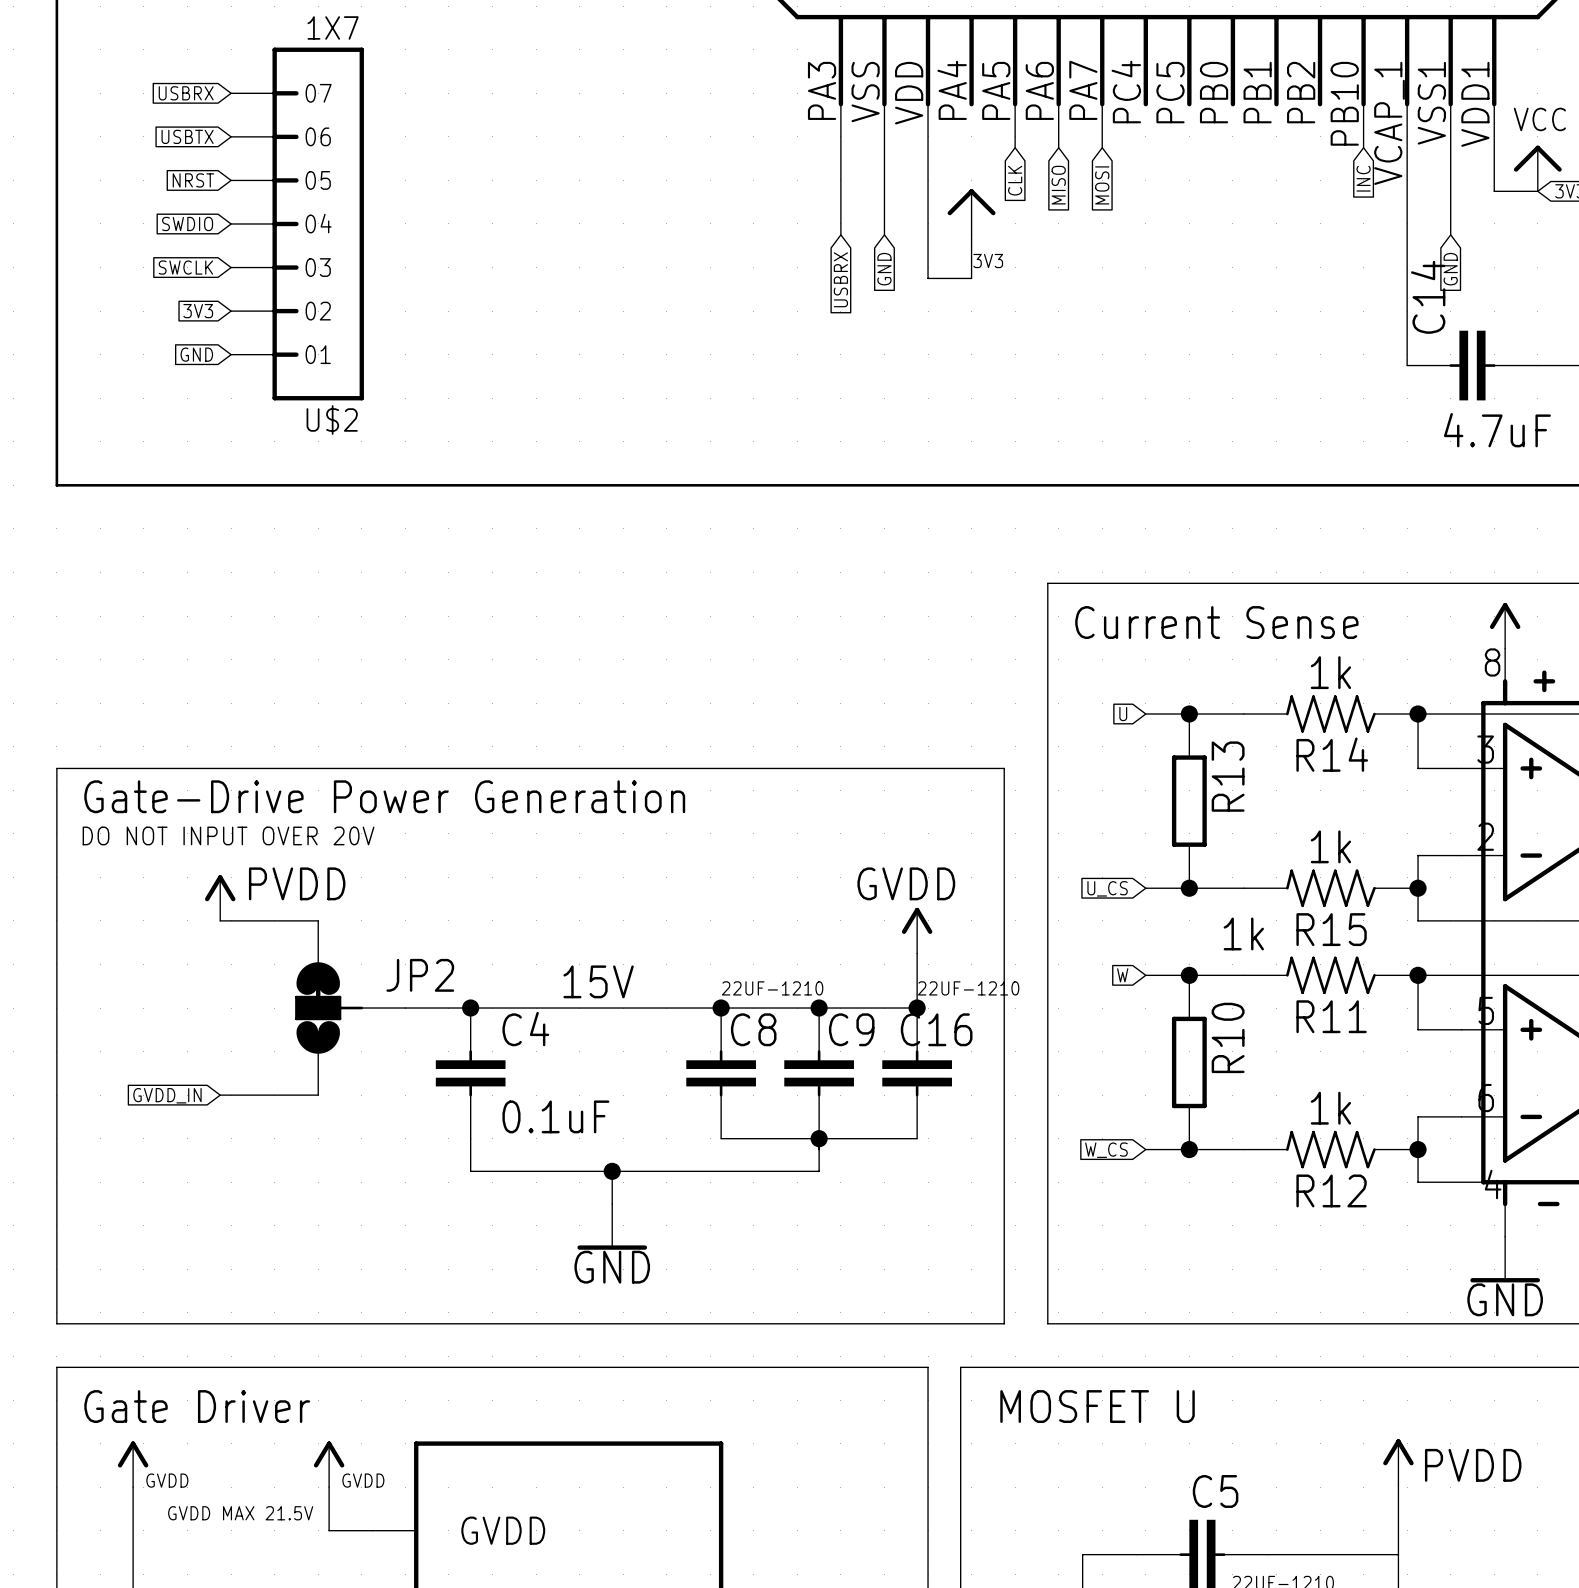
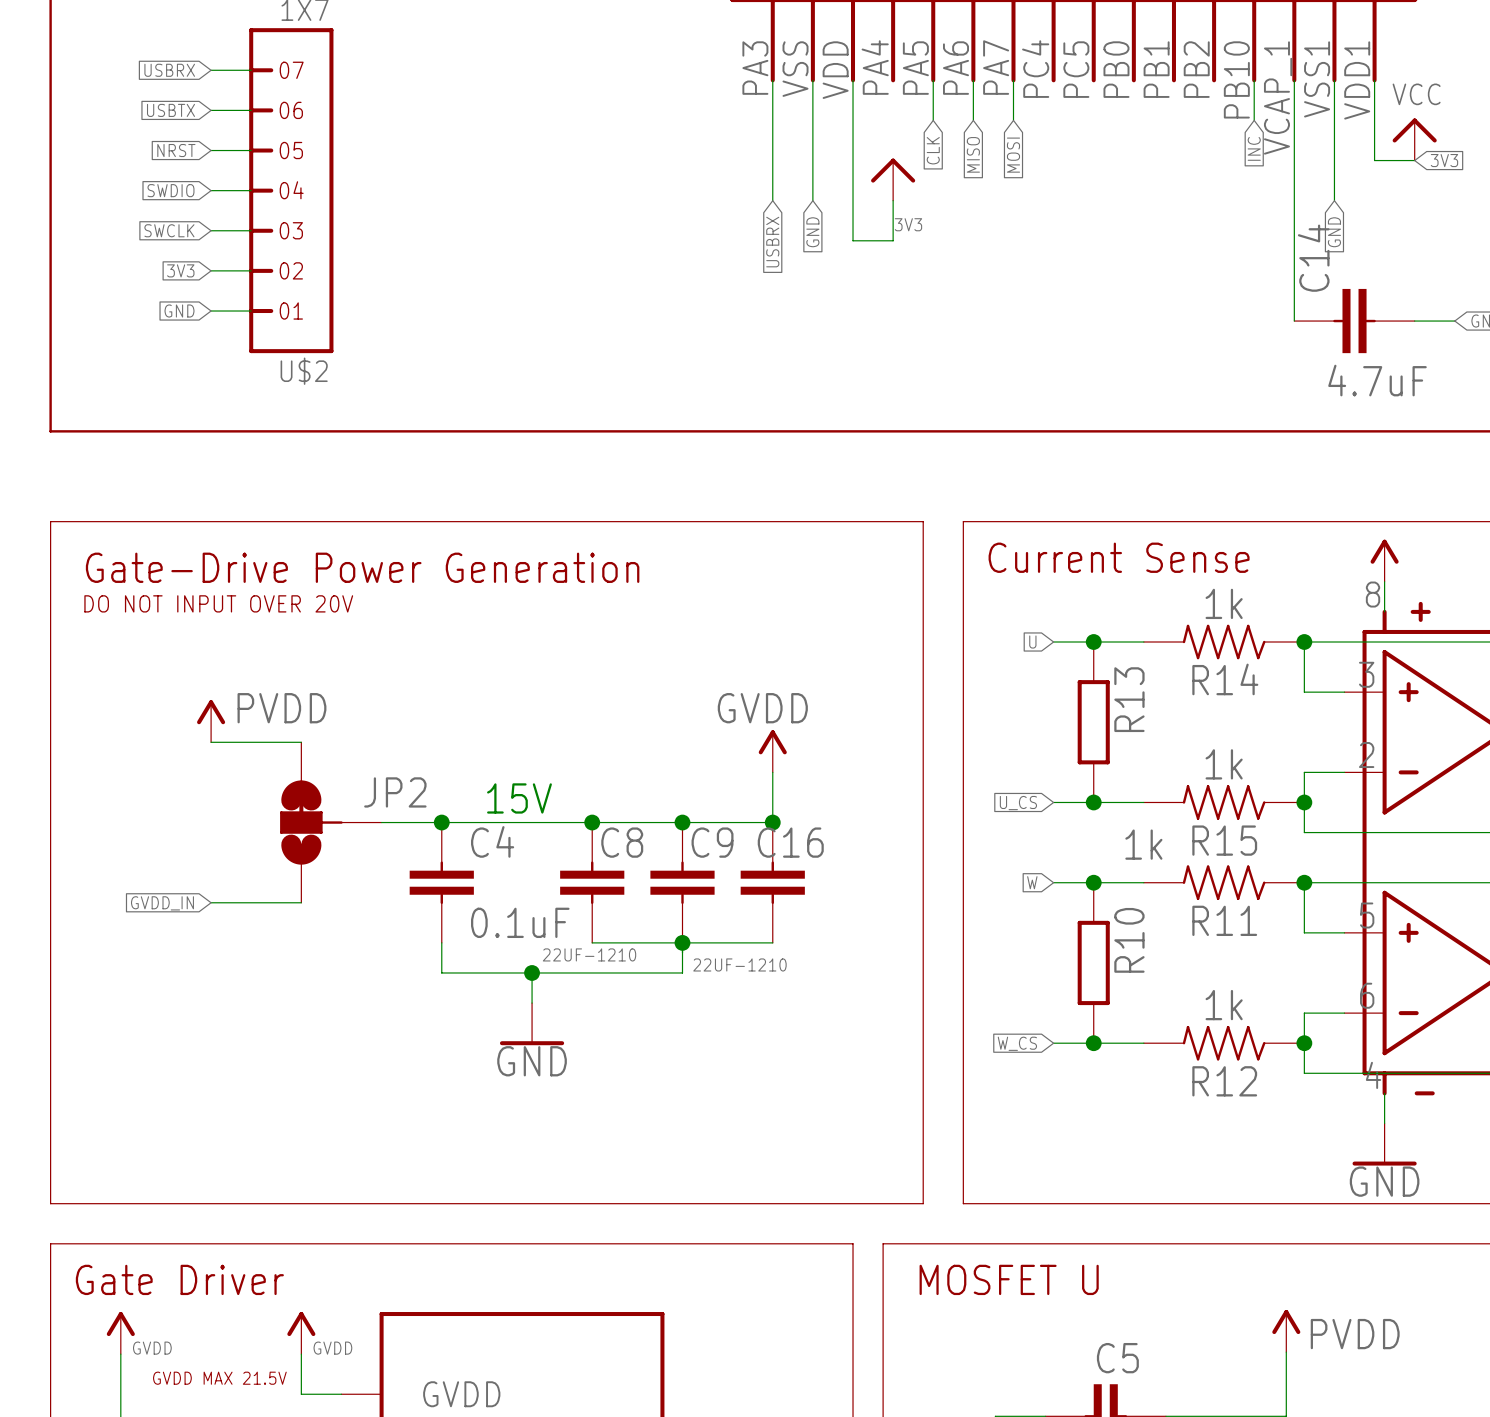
line: (56, 768) (1004, 768) -> (50, 692) (50, 521) (923, 521) (923, 692)
text position: Gate-Drive Power Generation (384, 796) -> Gate-Drive Power Generation (362, 567)
text position: DO NOT INPUT OVER 20V (228, 835) -> DO NOT INPUT OVER 20V (218, 603)
wire: none -> (772, 772) (772, 822) (381, 822)
label position: PVDD (297, 883) -> PVDD (281, 708)
label position: GVDD (906, 883) -> GVDD (762, 708)
power symbol position: (220, 898) -> (211, 721)
junction: none -> (441, 822)
junction: none -> (592, 822)
junction: none -> (682, 822)
junction: none -> (772, 822)
wire: (220, 920) (318, 920) -> (211, 742) (301, 742)
power symbol position: (917, 930) -> (772, 751)
wire: (917, 953) (917, 1008) (405, 1008) -> none
text position: 15V (598, 981) -> 15V (519, 798)
C8 value position: 22UF-1210 (772, 988) -> 22UF-1210 (589, 954)
C16 value position: 22UF-1210 (968, 988) -> 22UF-1210 (739, 964)
JP2 position: (350, 1008) -> (330, 822)
junction: (470, 1008) -> none
junction position: (721, 1008) -> (682, 942)
junction: (819, 1008) -> none
junction: (917, 1008) -> none
wire: none -> (441, 942) (441, 972) (682, 972) (682, 942)
C4 position: (470, 1073) -> (441, 882)
junction: none -> (532, 972)
C8 position: (721, 1073) -> (592, 882)
C9 position: (819, 1073) -> (682, 882)
C16 position: (917, 1073) -> (772, 882)
global label position: GVDD_IN (167, 1095) -> GVDD_IN (162, 903)
wire: (220, 1095) (318, 1095) -> (211, 902) (301, 902)
wire: (470, 1138) (470, 1171) (819, 1171) (819, 1138) -> none
wire: (721, 1138) (917, 1138) -> (592, 942) (772, 942)
junction: (819, 1138) -> none
wire: (612, 1171) (612, 1204) -> (532, 972) (532, 1003)
junction: (612, 1171) -> none
power symbol position: GND (612, 1226) -> GND (532, 1024)

